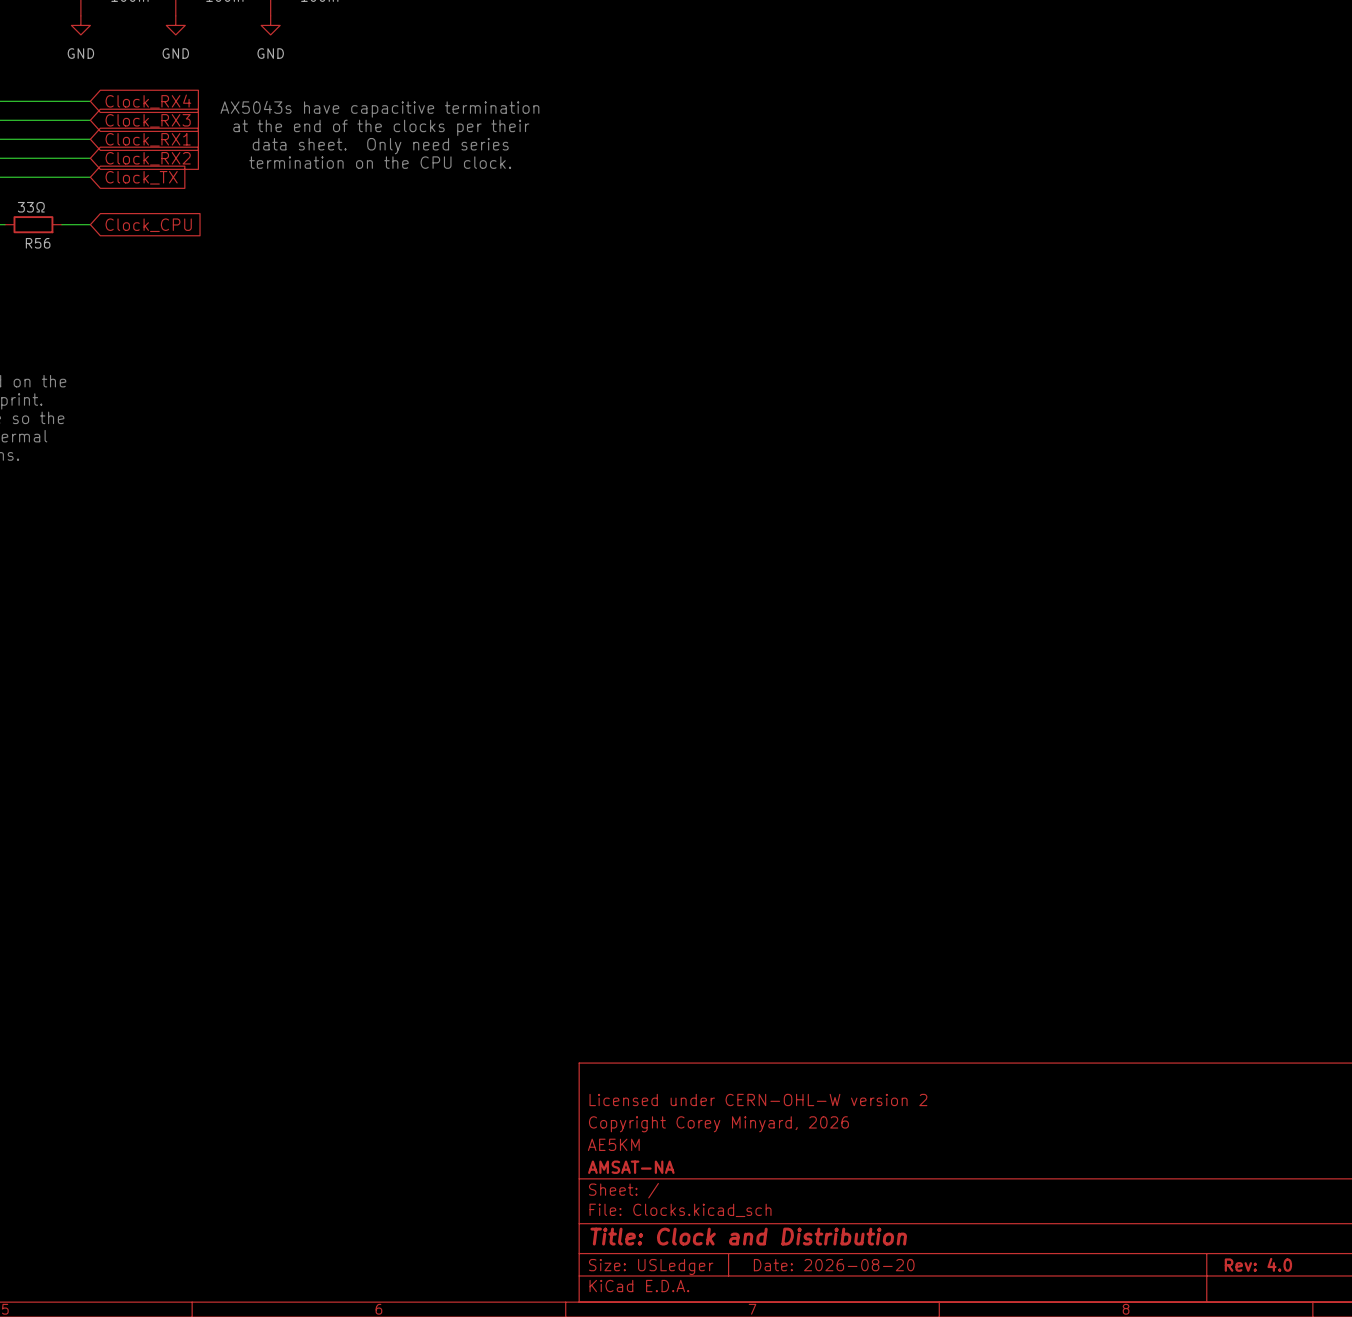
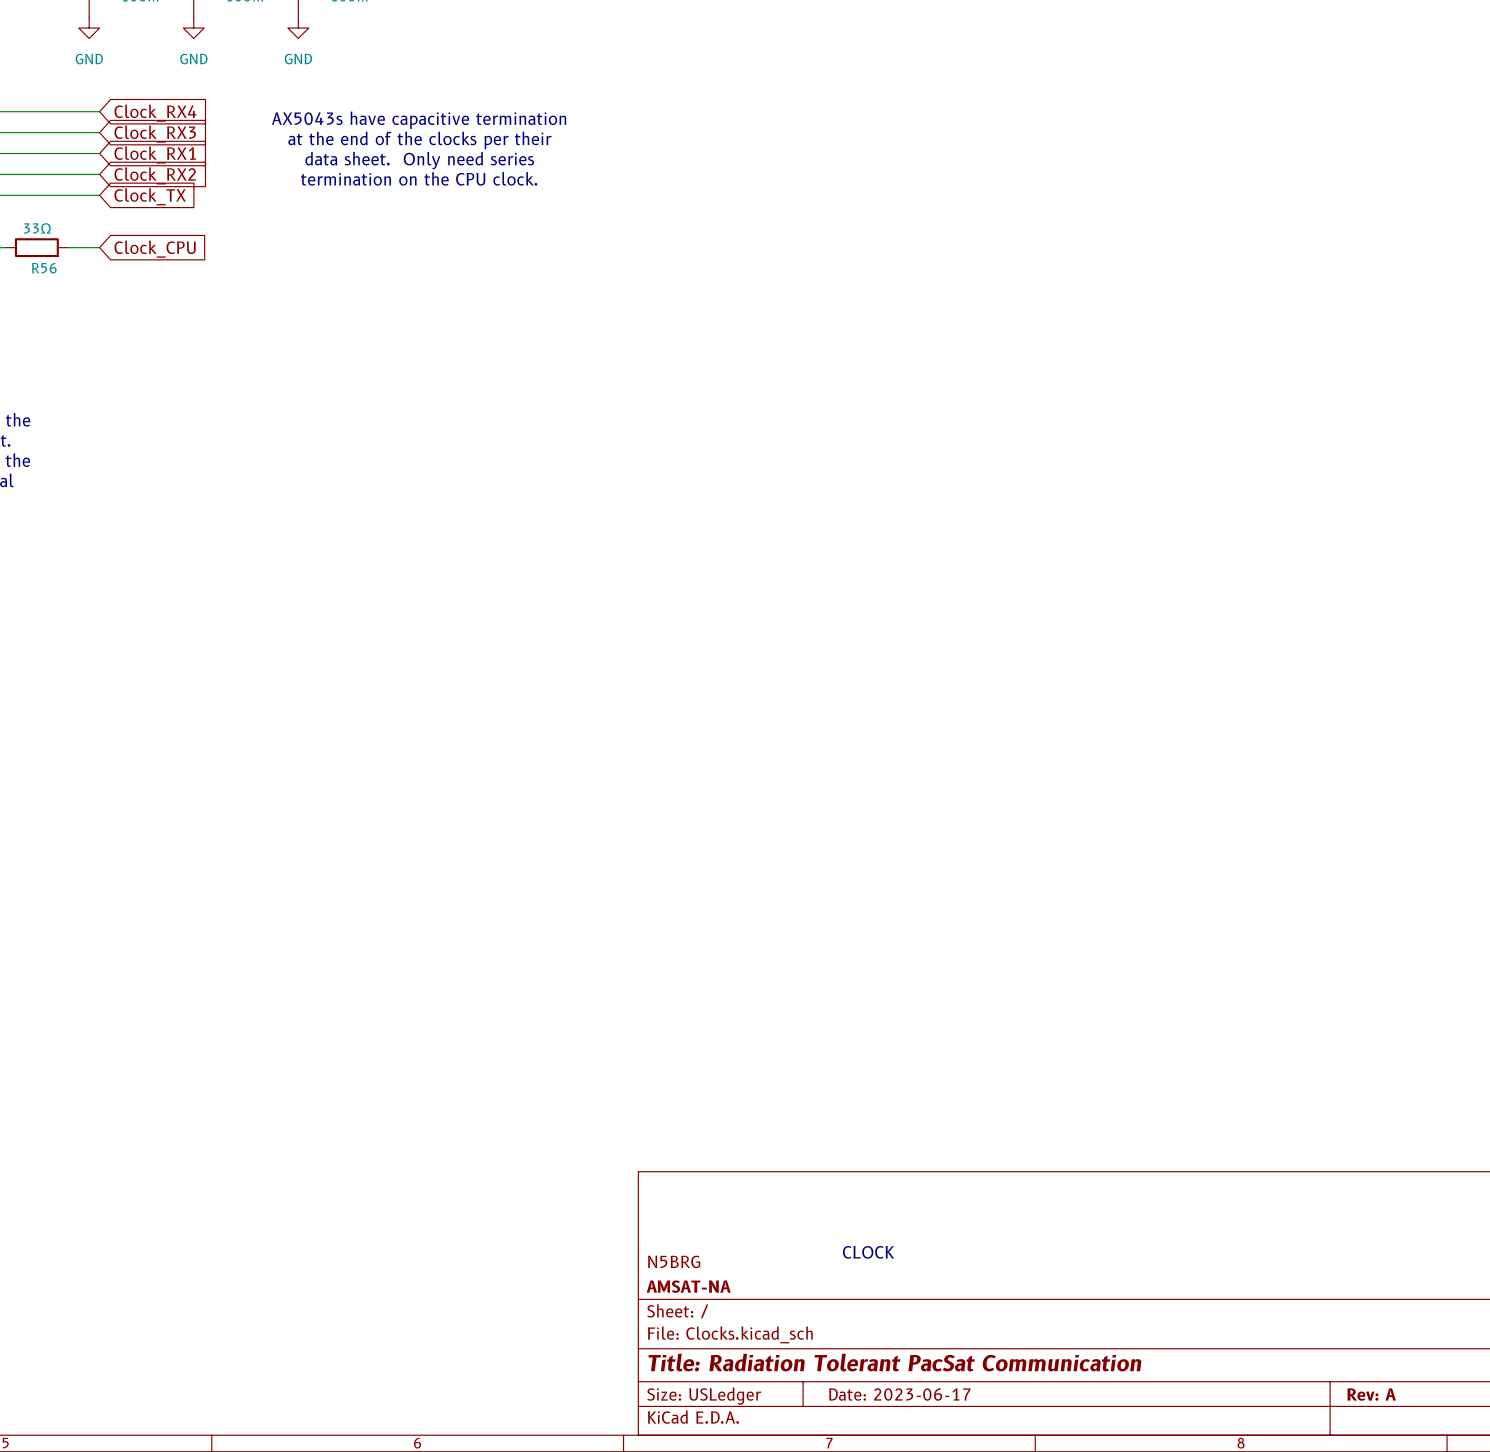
title block: Licensed under CERN-OHL-W version 2 (758, 1099) -> none
title block: Copyright Corey Minyard, 2026 (718, 1124) -> none
text: none -> CLOCK (868, 1252)
title block: AE5KM (613, 1144) -> N5BRG (674, 1261)
title block: Title: Clock and Distribution (748, 1236) -> Title: Radiation Tolerant PacSat Communication (894, 1362)
title block: Rev: 4.0 (1258, 1264) -> Rev: A (1371, 1394)
title block: Date: 2026-08-20 (834, 1265) -> Date: 2023-06-17 (899, 1394)

